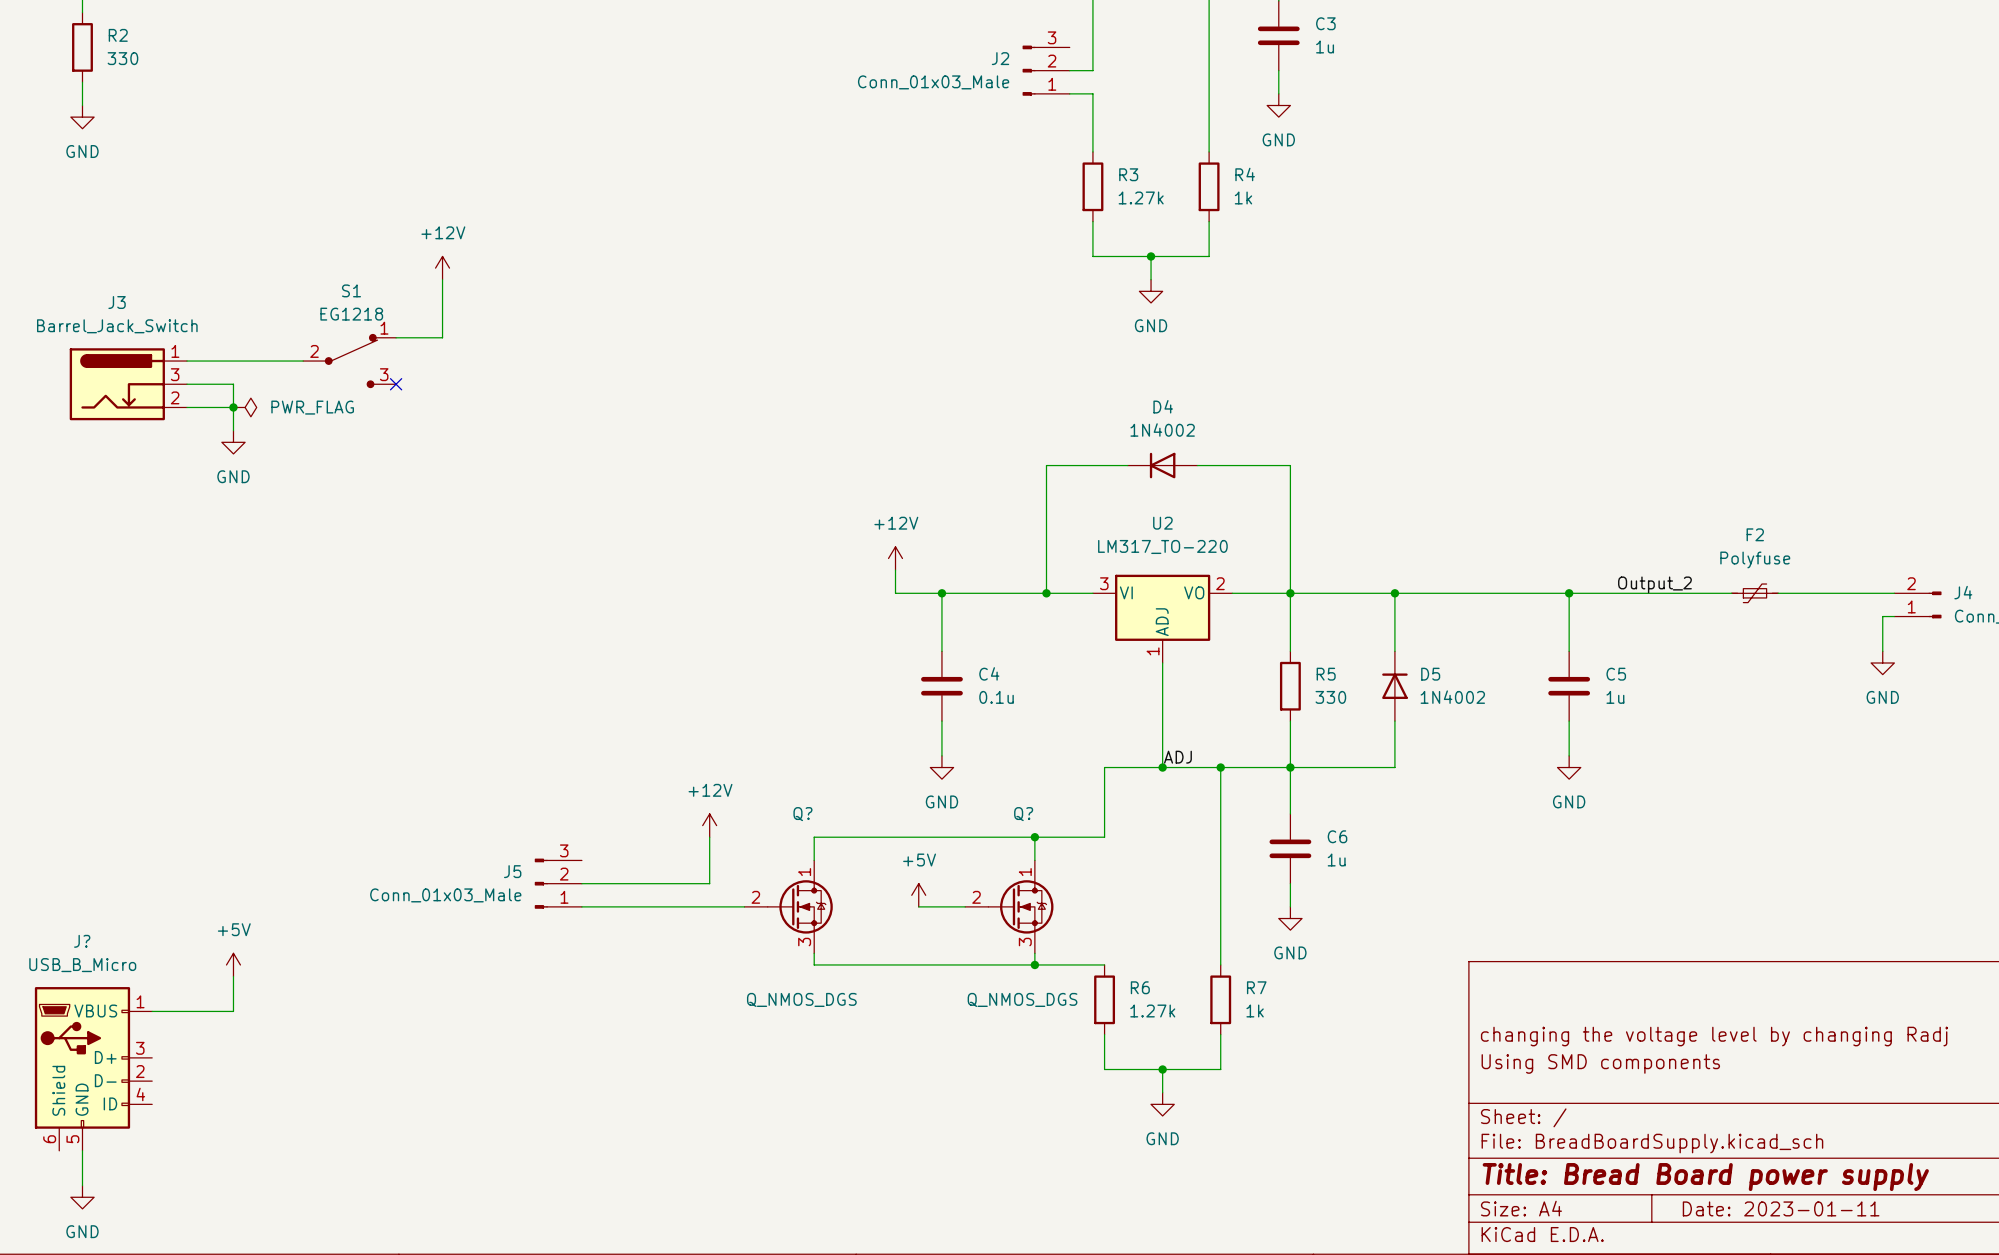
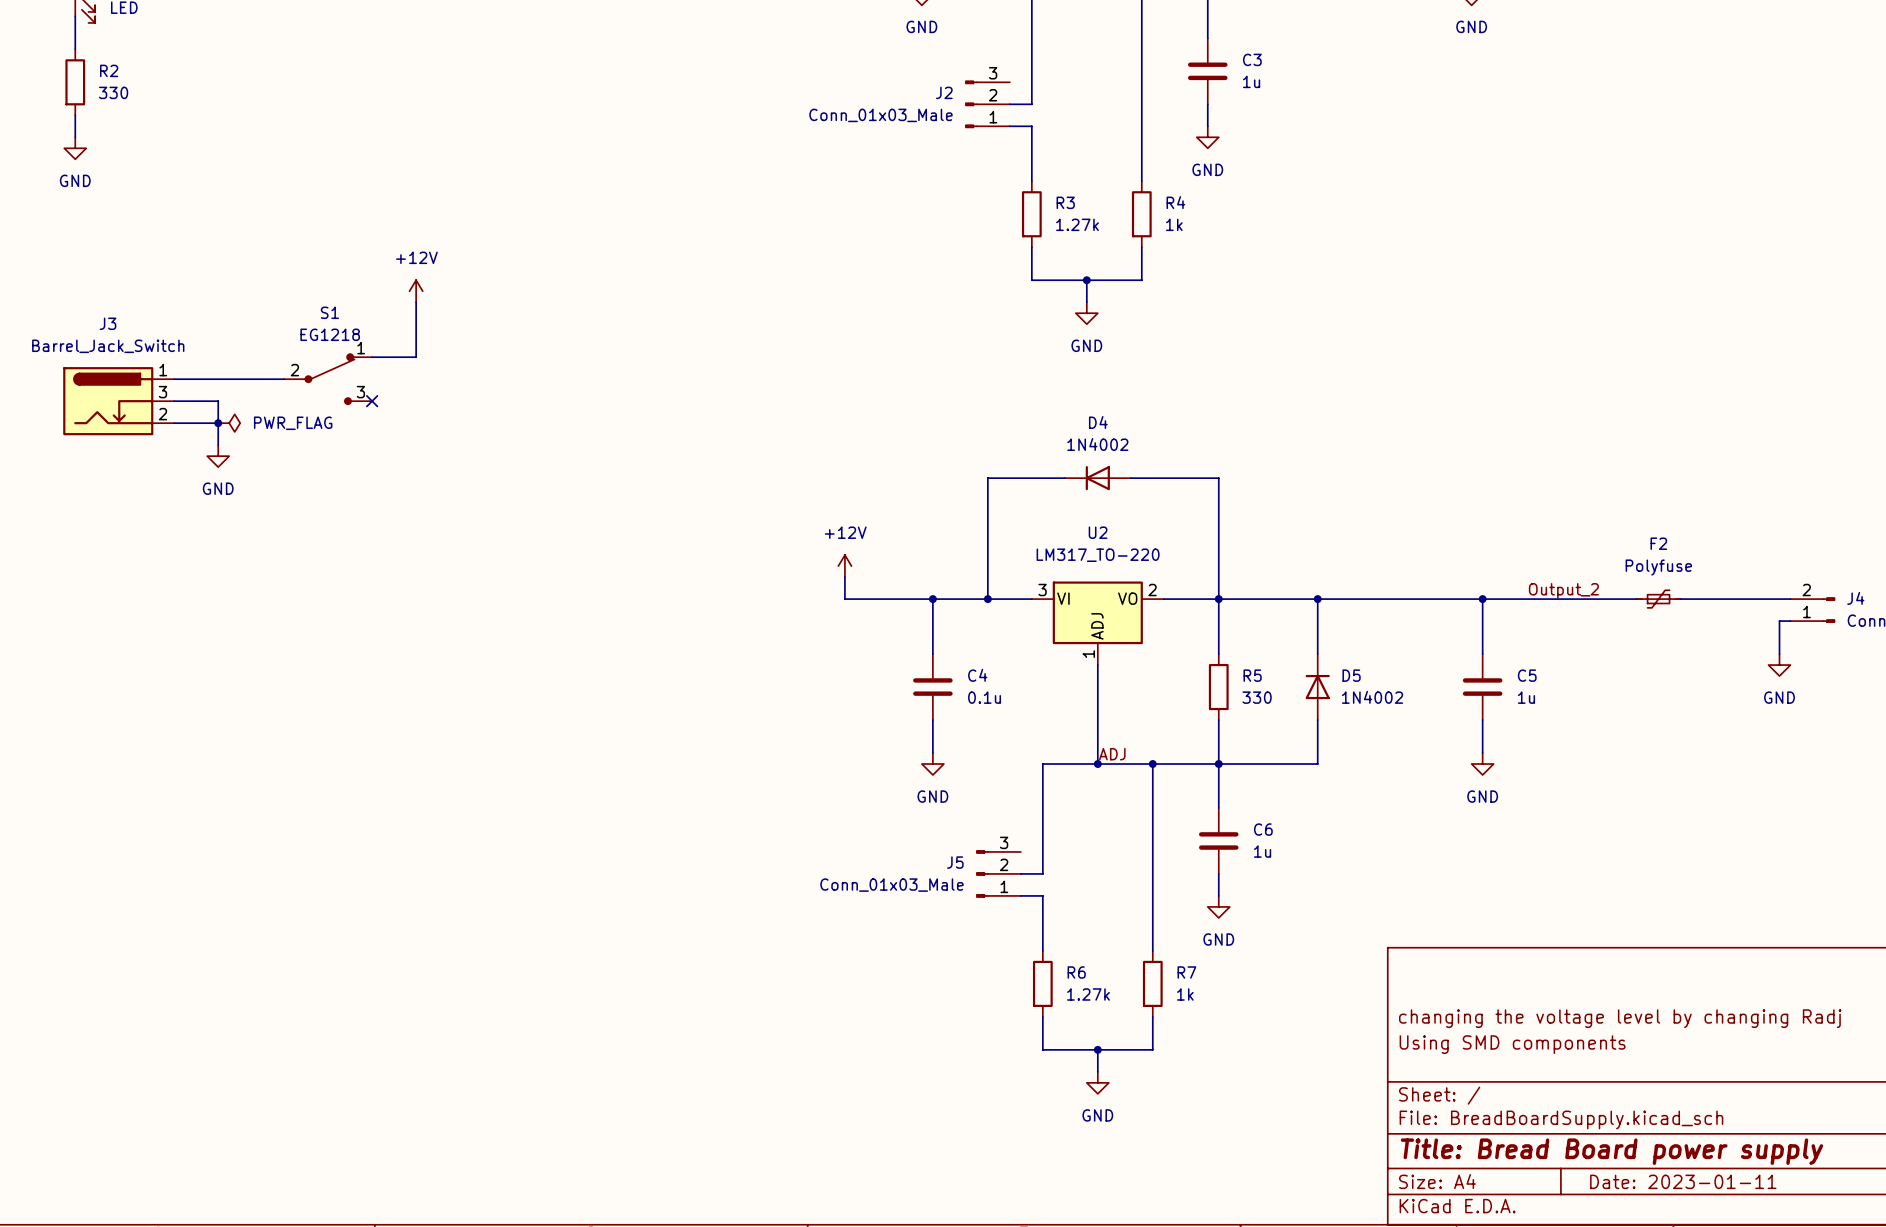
wire: (941, 593) (941, 651) -> (932, 599) (932, 654)
junction position: (941, 593) -> (932, 599)
C4 position: (941, 686) -> (932, 687)
wire: (941, 721) (941, 755) -> (932, 720) (932, 753)
power symbol position: GND (941, 767) -> GND (932, 764)
power symbol: +12V (709, 825) -> none
wire: (709, 837) (709, 883) (581, 883) -> none
wire: (1034, 837) (1034, 860) -> none
junction: (1034, 837) -> none
wire: (1104, 837) (814, 837) (814, 860) -> (1042, 829) (1042, 873) (1020, 873)
J5 position: (558, 883) -> (998, 873)
power symbol: +5V (918, 895) -> none
wire: (581, 906) (744, 906) -> none
Q?: Q_NMOS_DGS (788, 906) -> none
wire: (918, 906) (965, 906) -> none
Q?: Q_NMOS_DGS (1009, 906) -> none
wire: (814, 953) (814, 964) (1104, 964) -> (1020, 895) (1042, 895) (1042, 950)
wire: (1034, 953) (1034, 964) -> none
power symbol: +5V (233, 964) -> none
junction: (1034, 964) -> none
wire: (233, 976) (233, 1011) (152, 1011) -> none
J?: USB_B_Micro (93, 1068) -> none
wire: (82, 1150) (82, 1185) -> none
power symbol: GND (82, 1197) -> none

